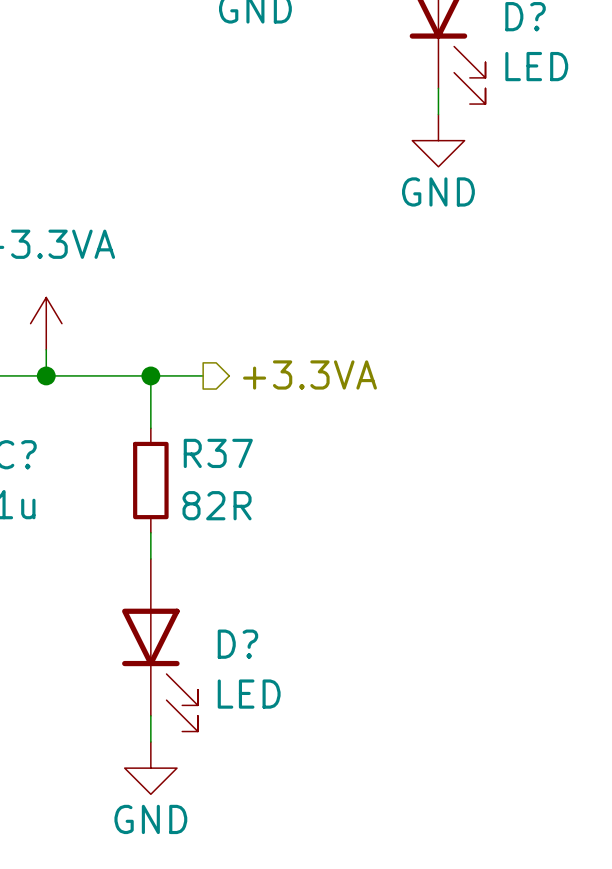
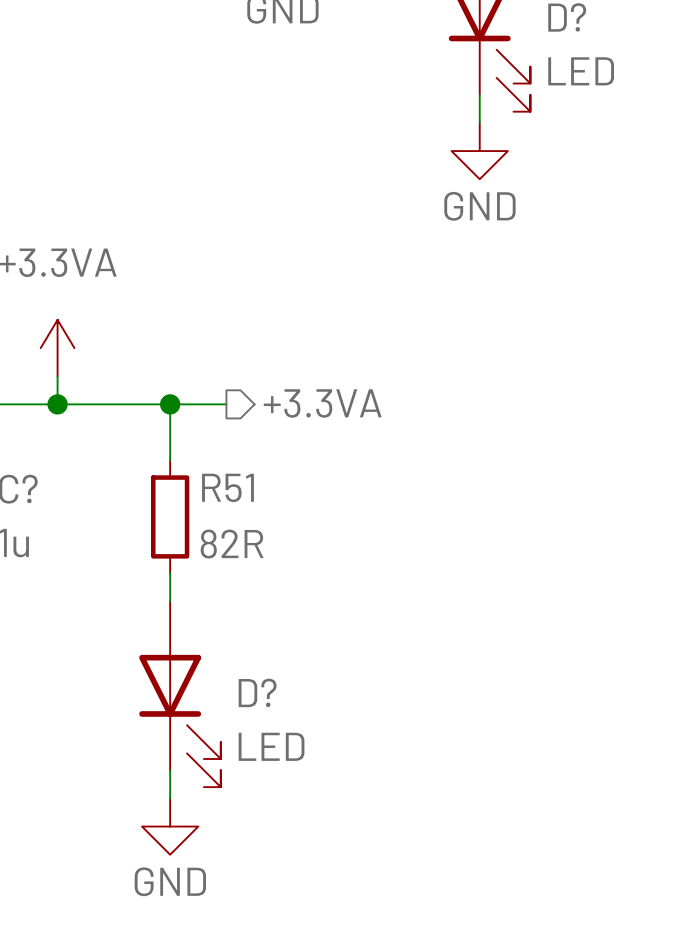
R37 name: R37 (218, 453) -> R51 (227, 487)

